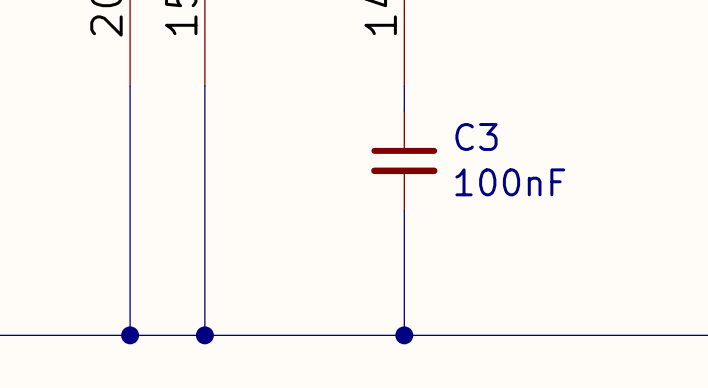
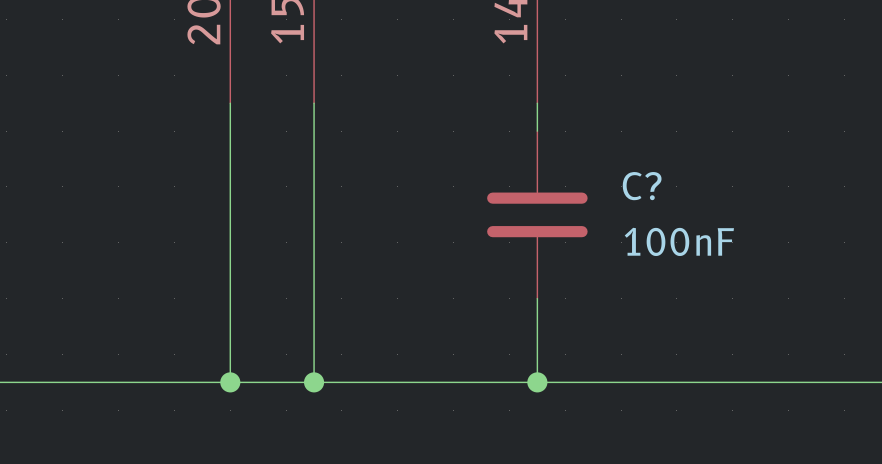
C3: 100nF (404, 160) -> none
C?: none -> 100nF (537, 214)

